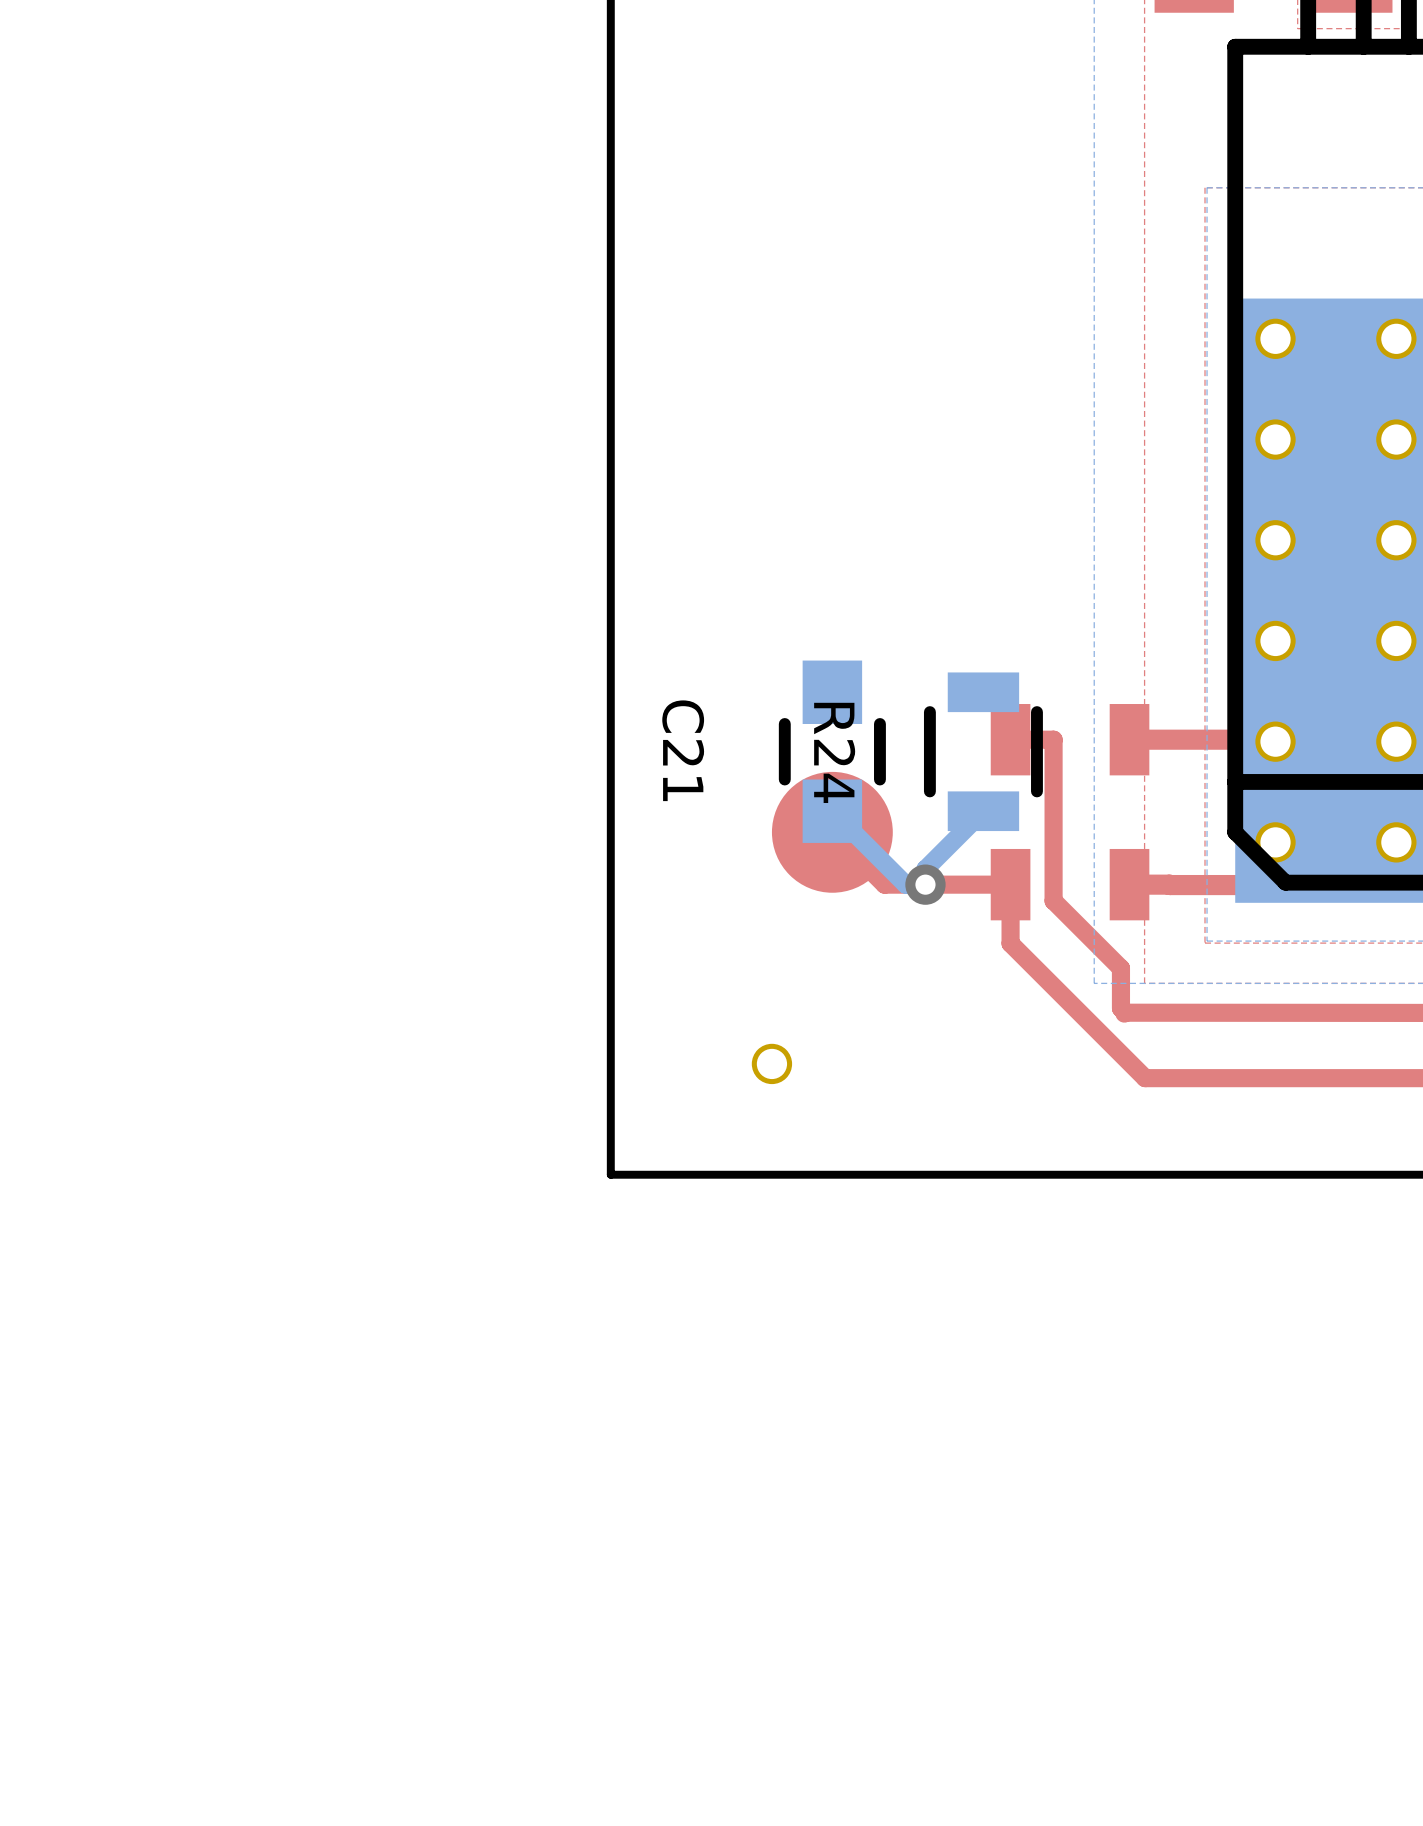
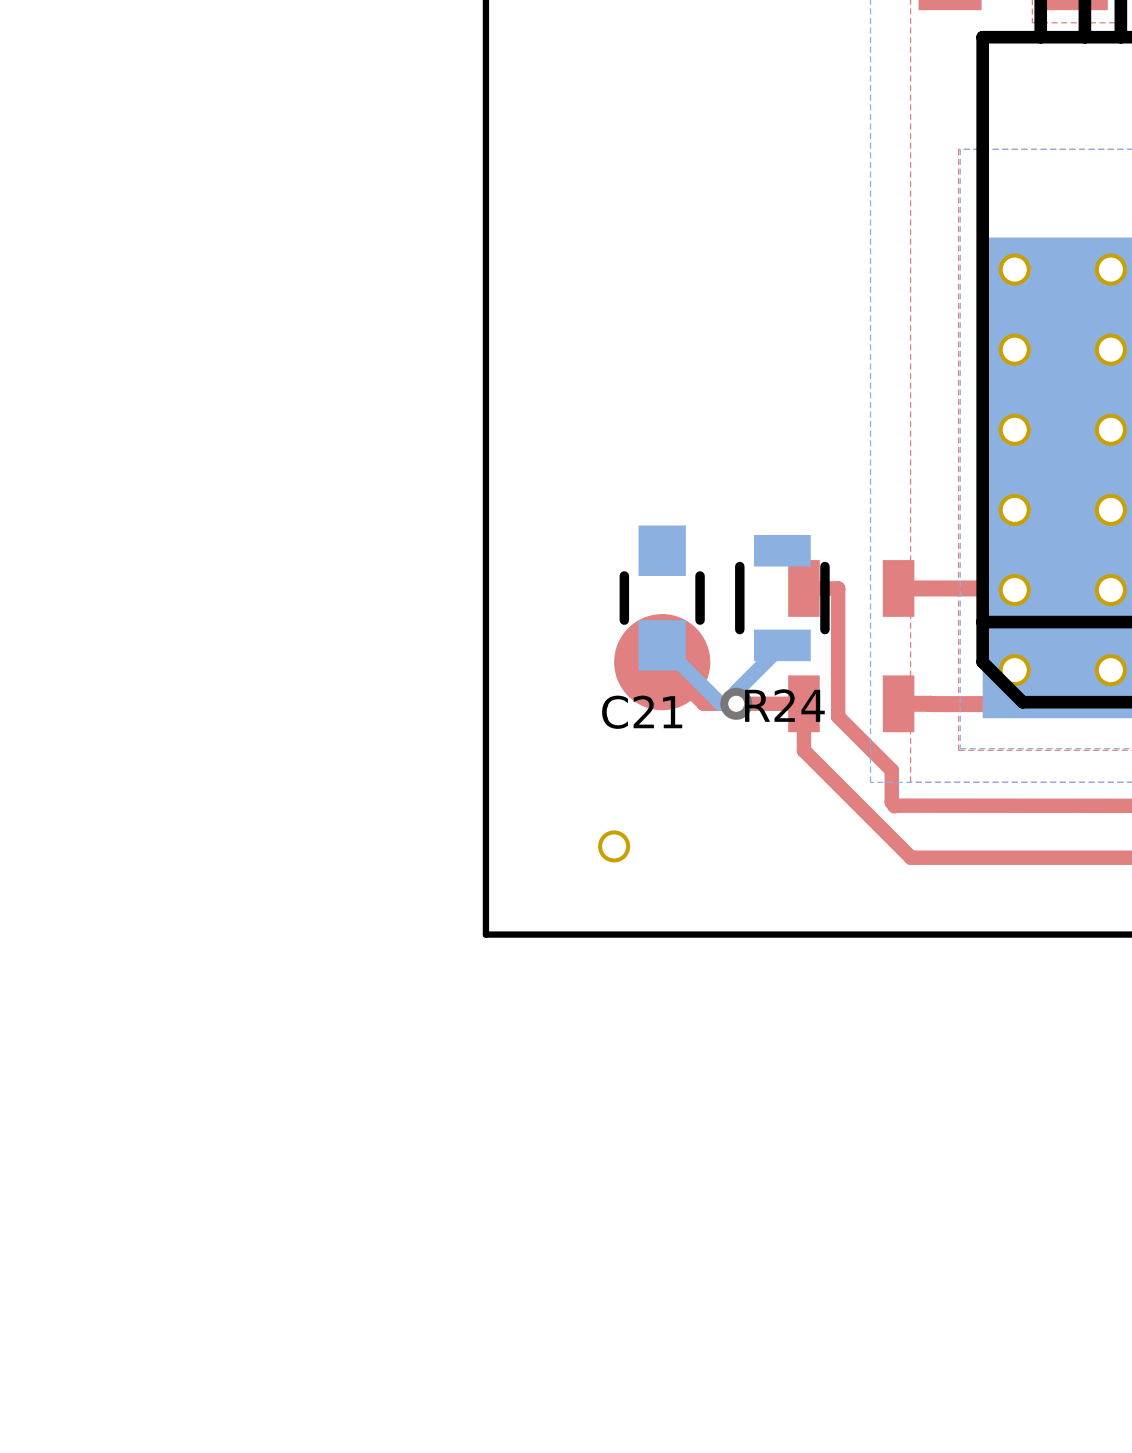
C21 name rotation: 0° (683, 750) -> 90° counterclockwise (642, 712)
C21 name position: C21 (683, 750) -> C21 (642, 712)
R24 name rotation: 0° (834, 752) -> 90° counterclockwise (784, 705)
R24 name position: R24 (834, 752) -> R24 (784, 705)

